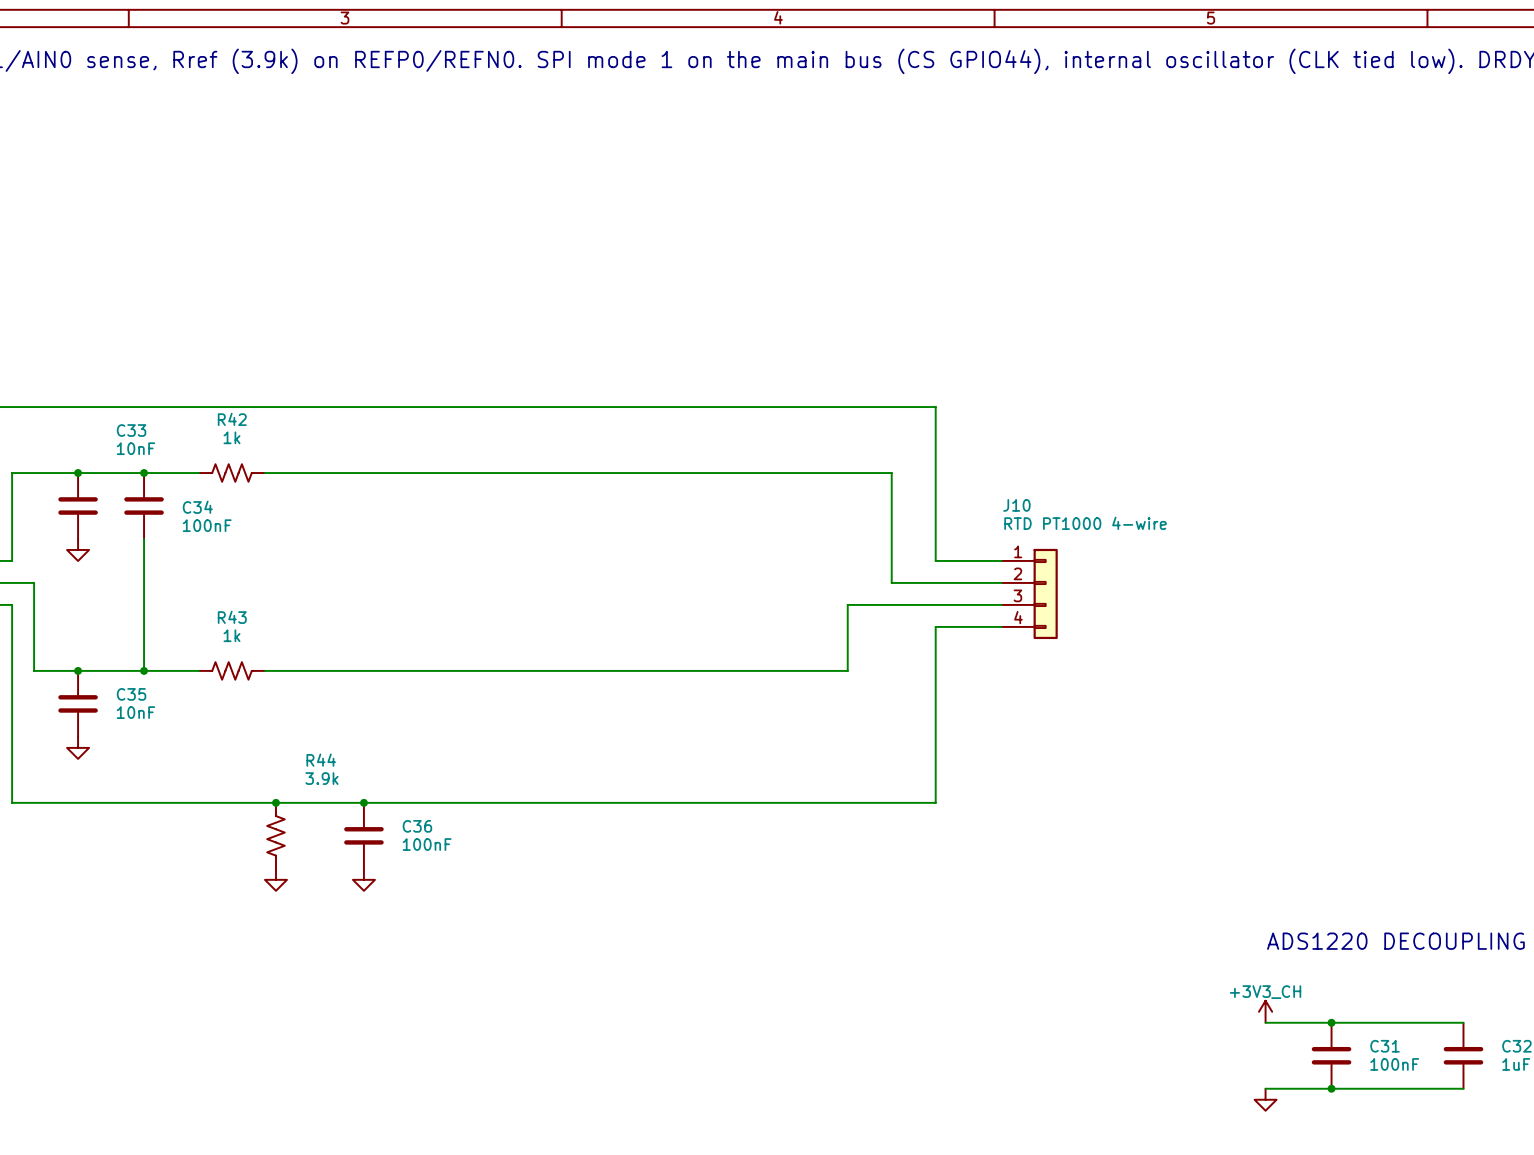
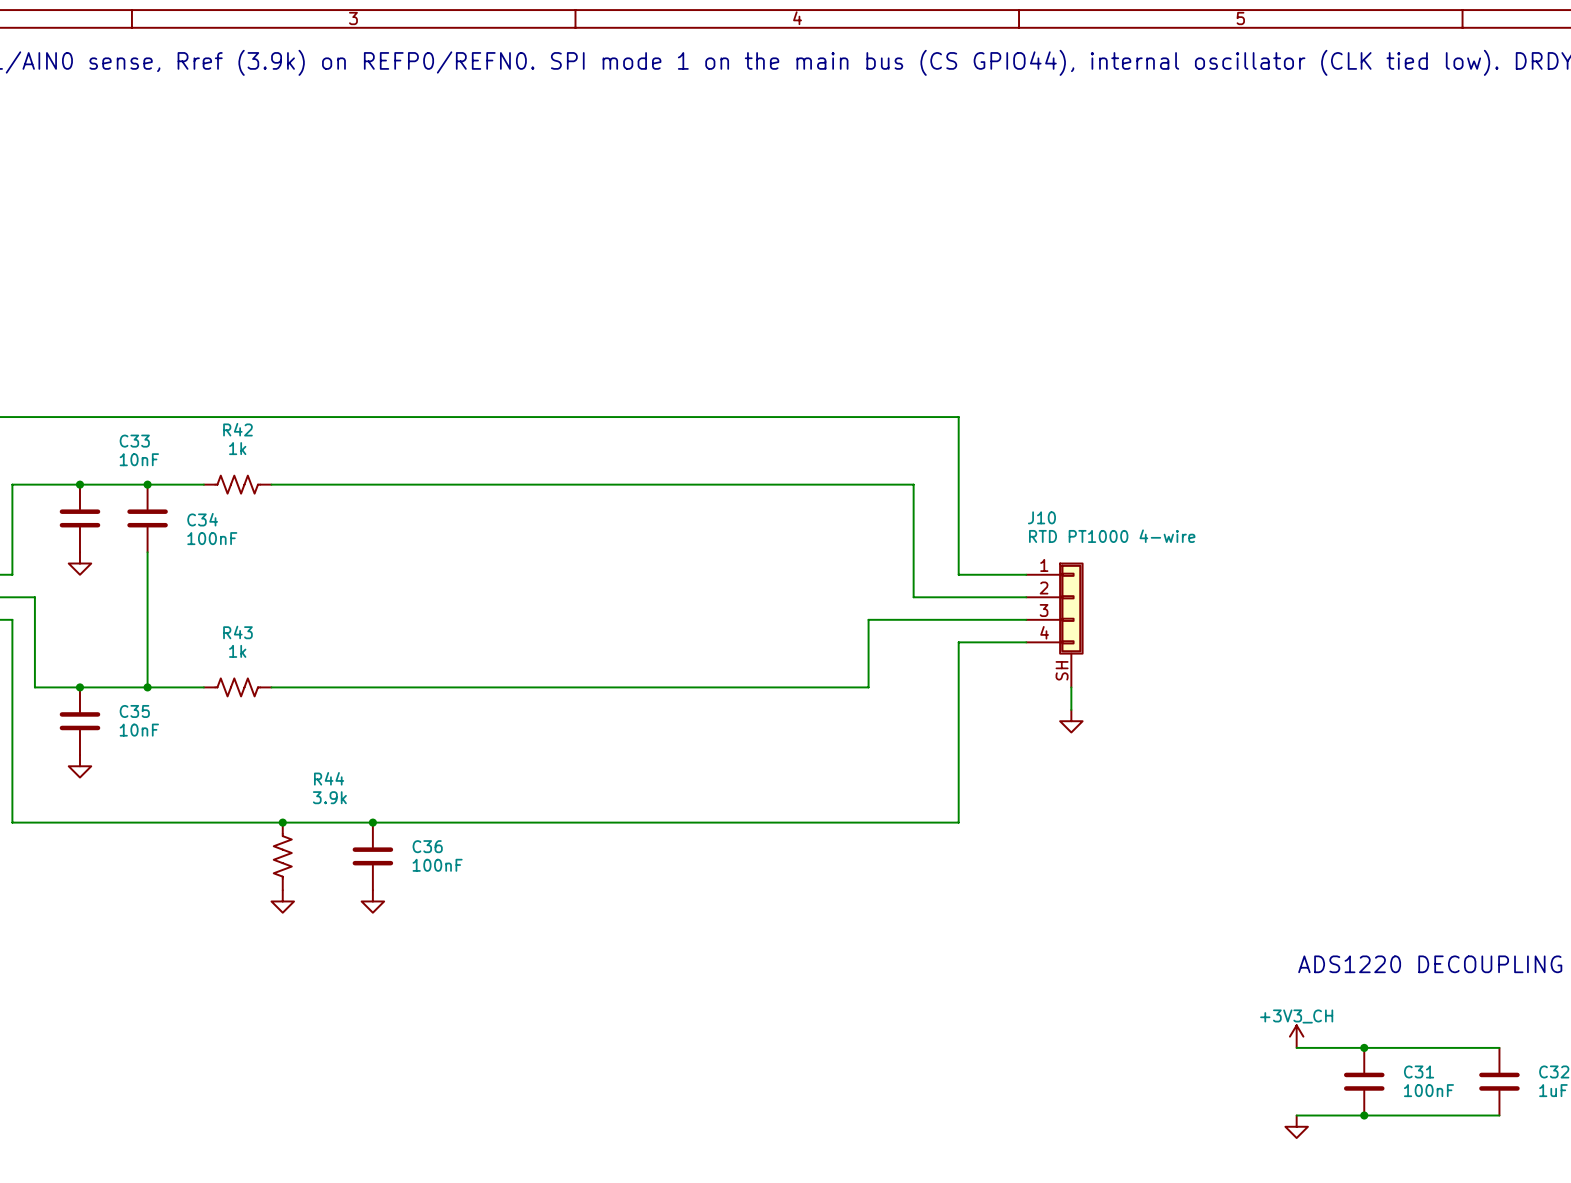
J10 symbol: [1001, 548, 1058, 640] -> [1026, 562, 1084, 688]
wire: none -> (1071, 687) (1071, 709)
power symbol: none -> (1071, 721)

